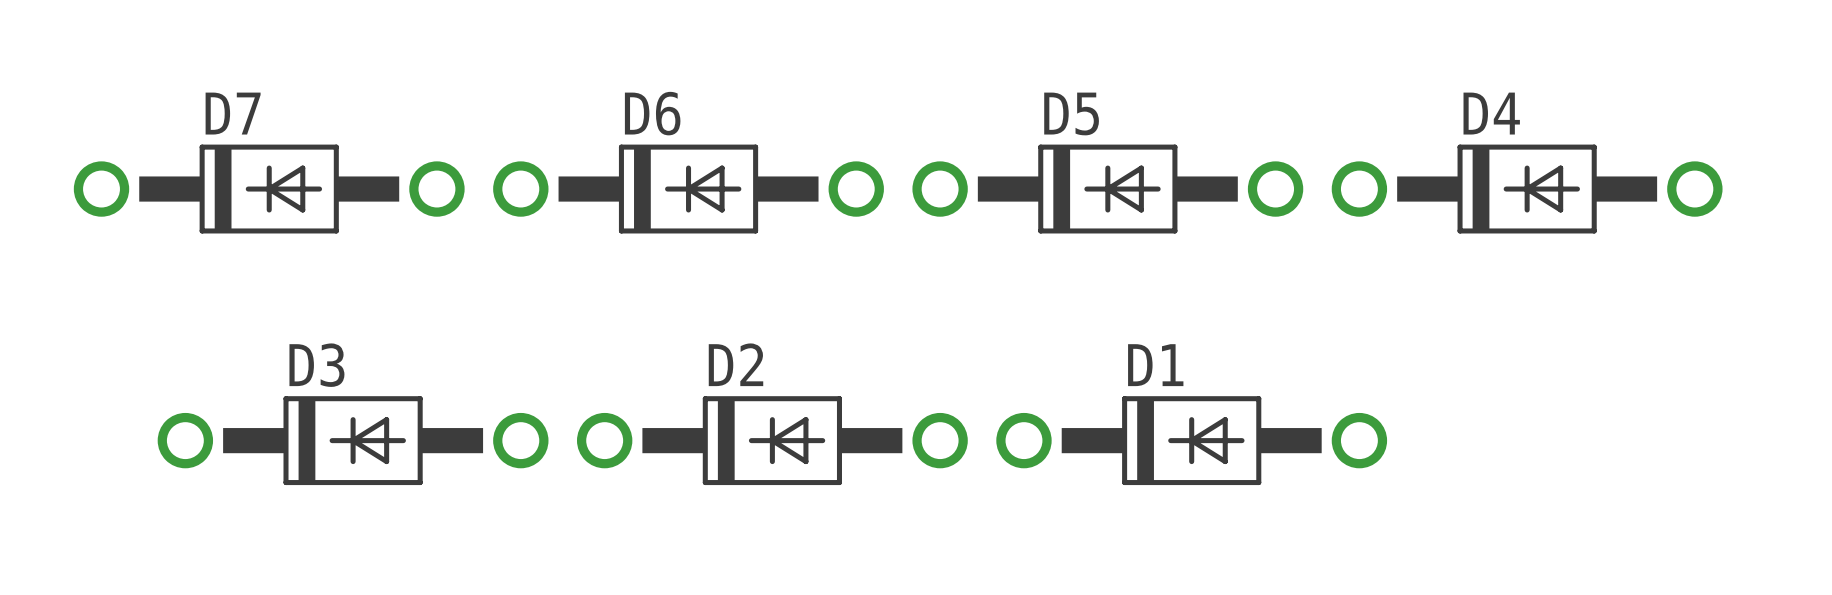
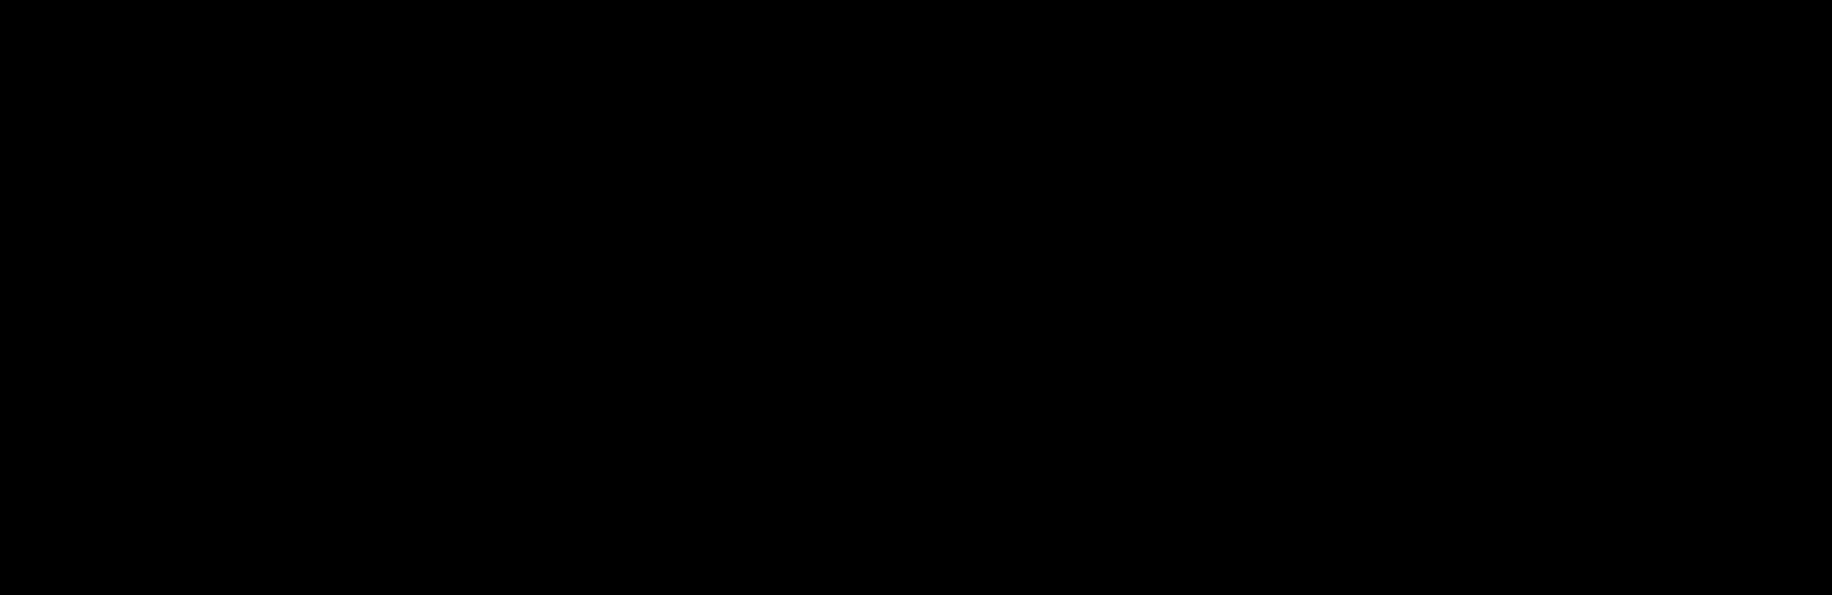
D7: (269, 189) -> none
D6: (688, 189) -> none
D5: (1107, 189) -> none
D4: (1527, 189) -> none
D3: (353, 440) -> none
D2: (772, 440) -> none
D1: (1191, 440) -> none

